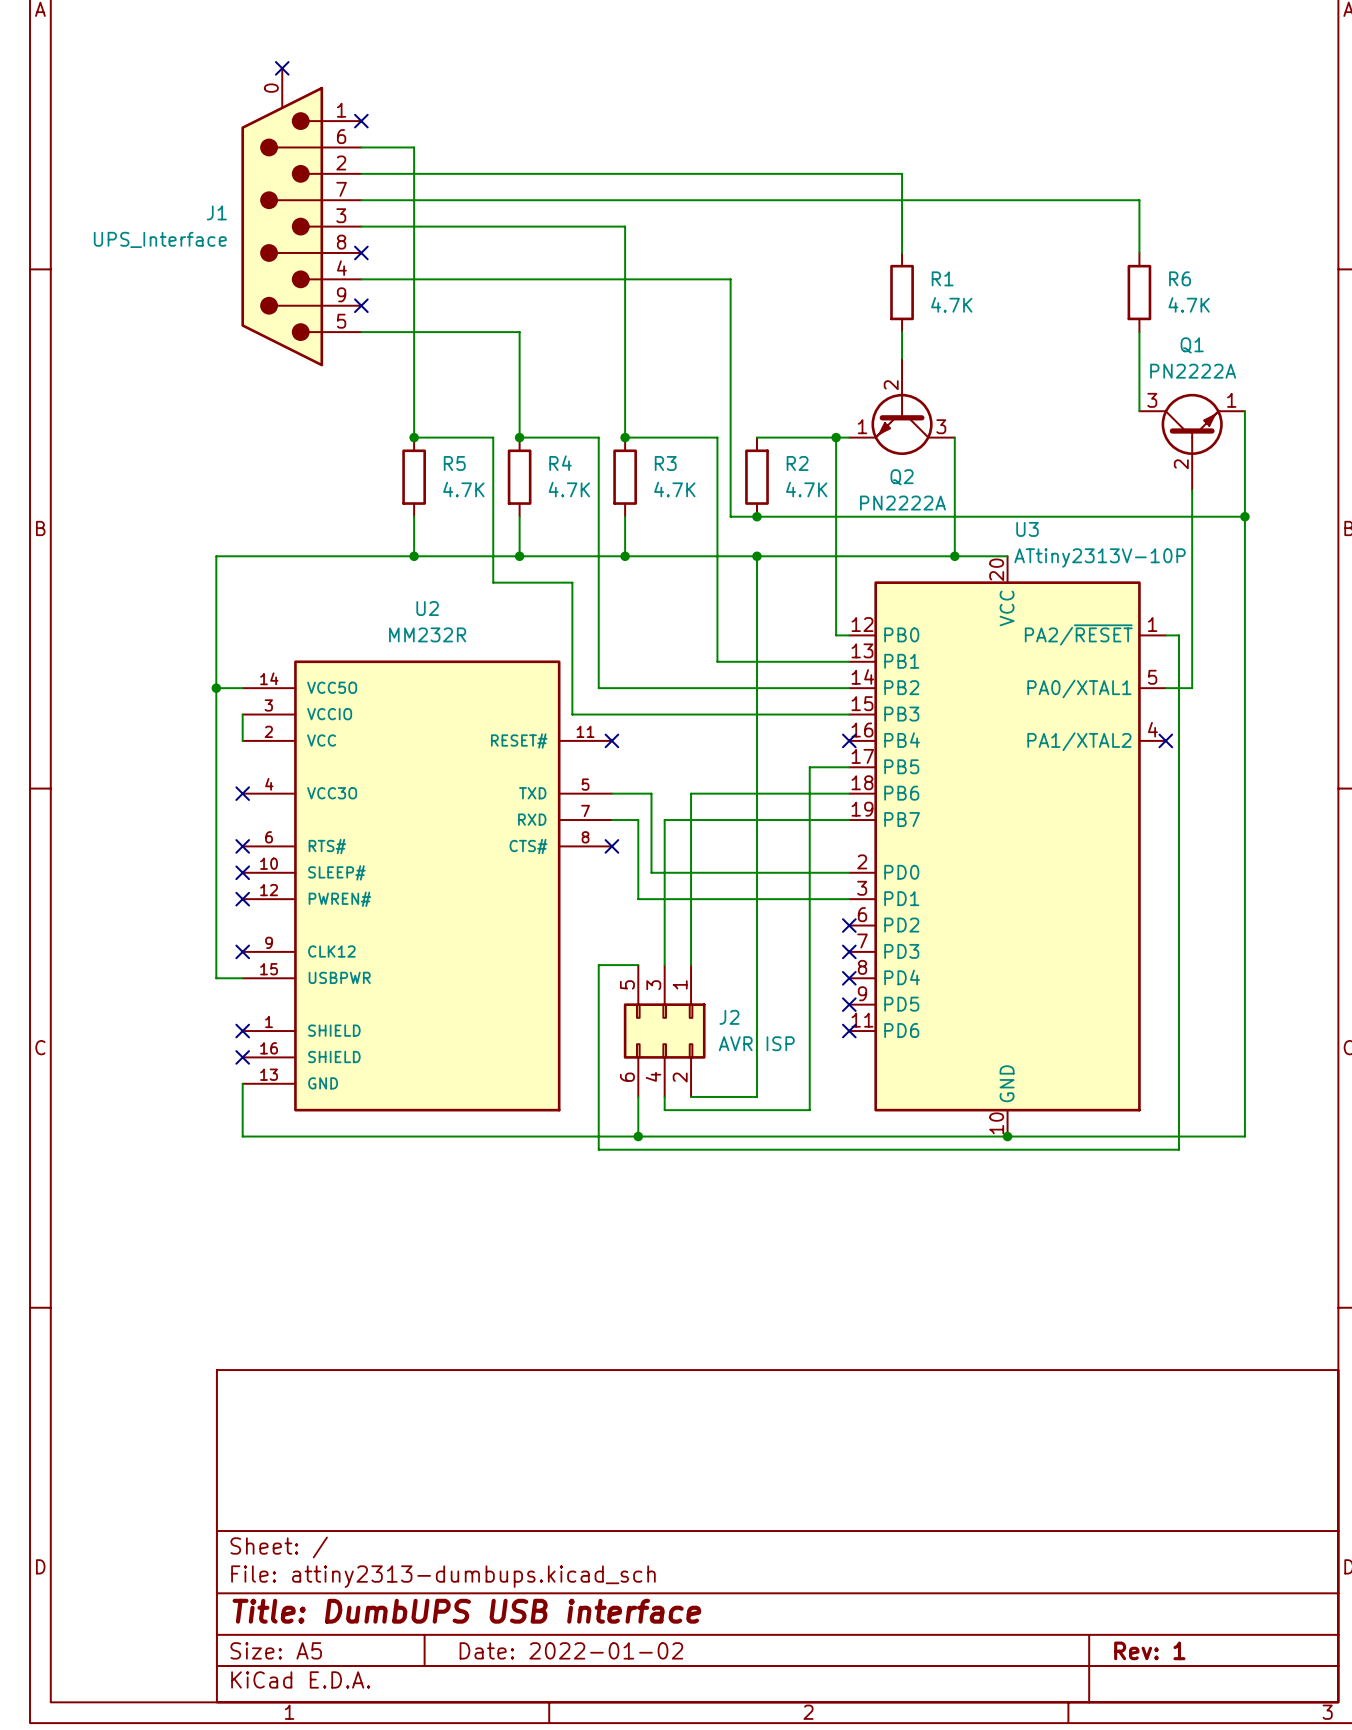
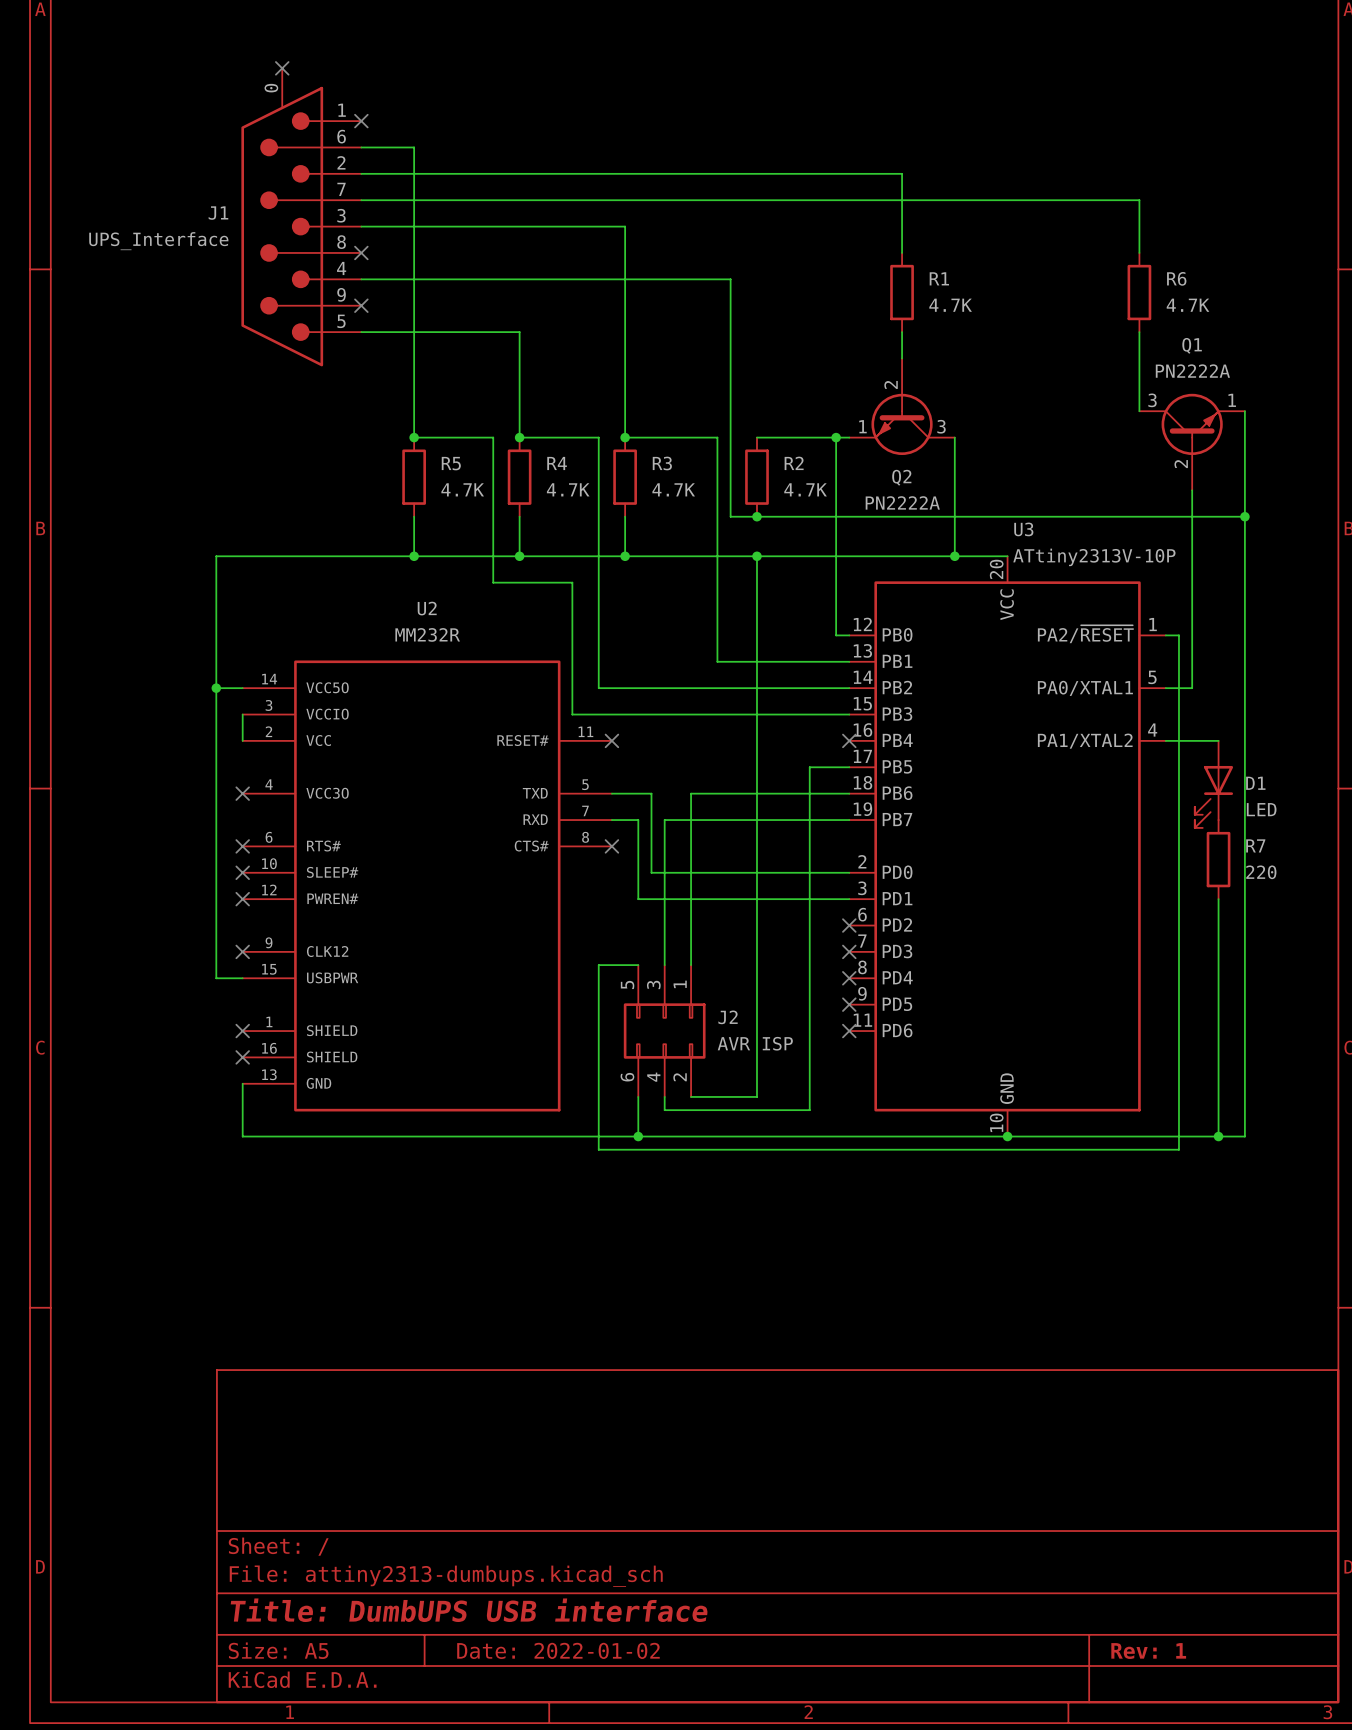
wire: none -> (1165, 740) (1218, 740)
no-connect mark: (1165, 740) -> none
D1: none -> LED (1213, 784)
R7: none -> 220 (1218, 859)
wire: none -> (1218, 899) (1218, 1136)
junction: none -> (1218, 1136)

